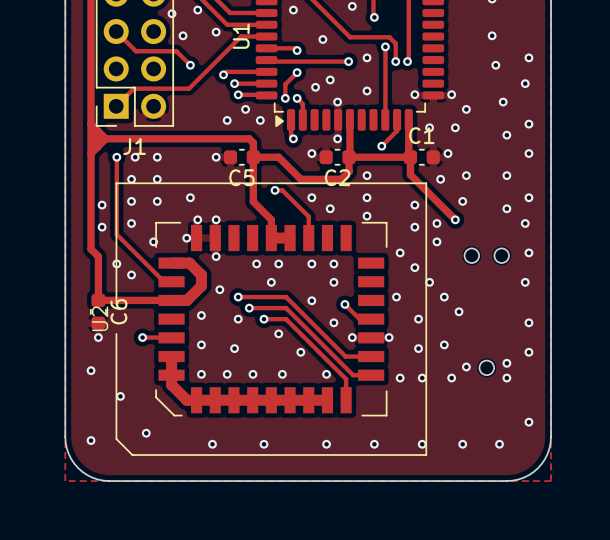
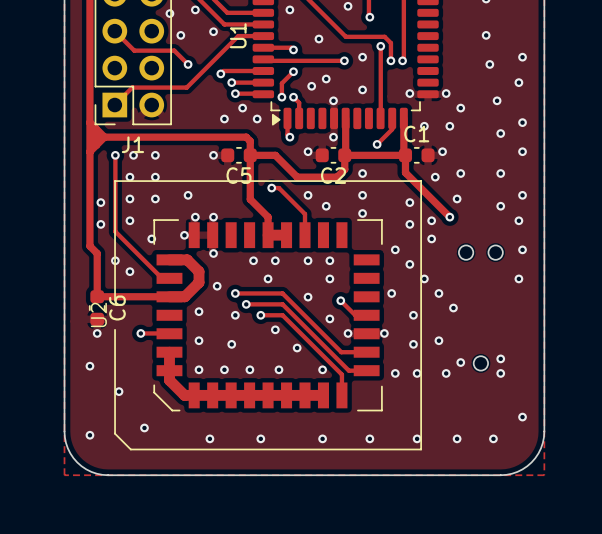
via: (528, 322) -> none
via: (528, 352) -> none

